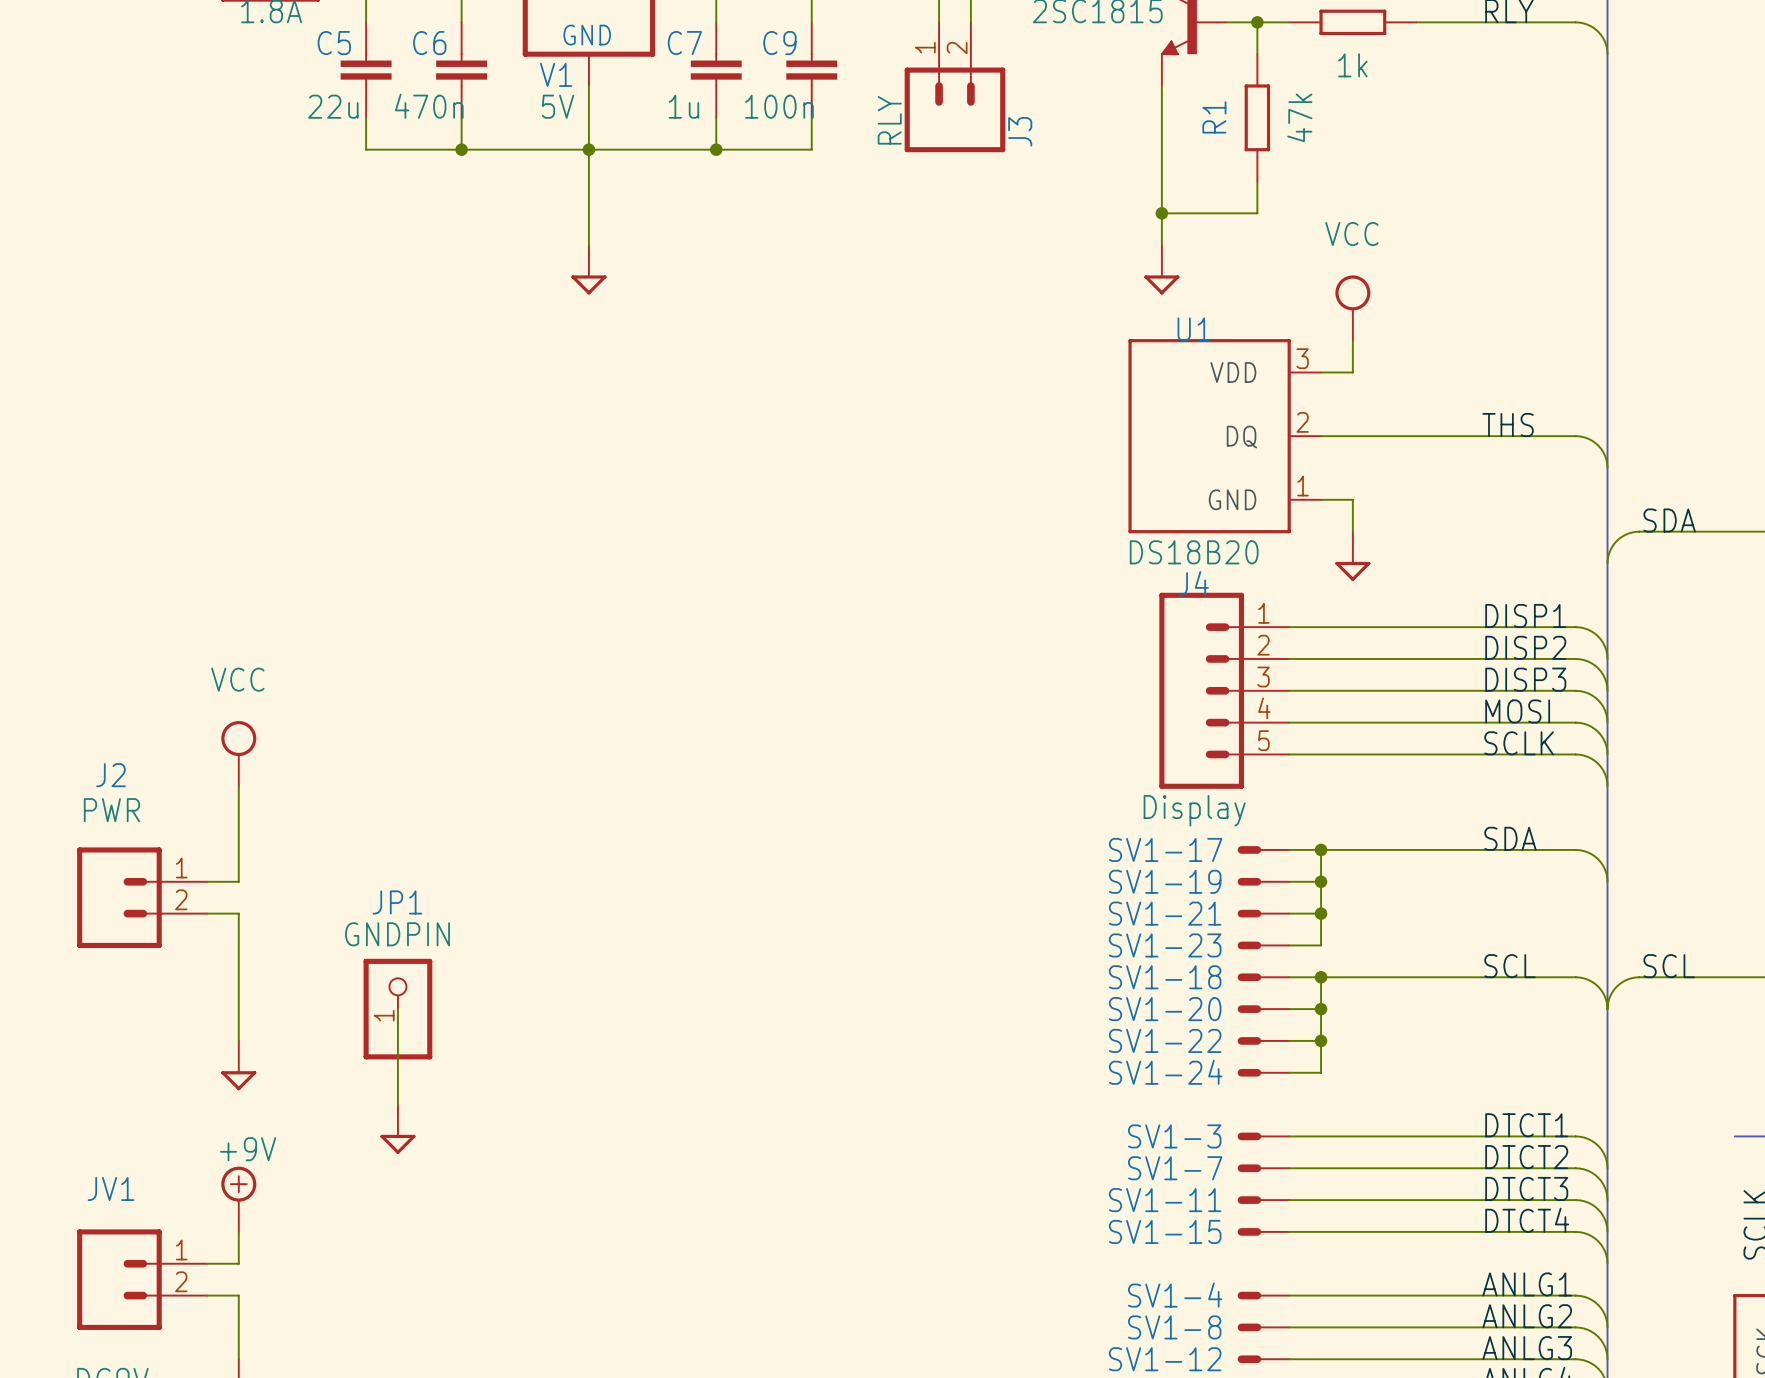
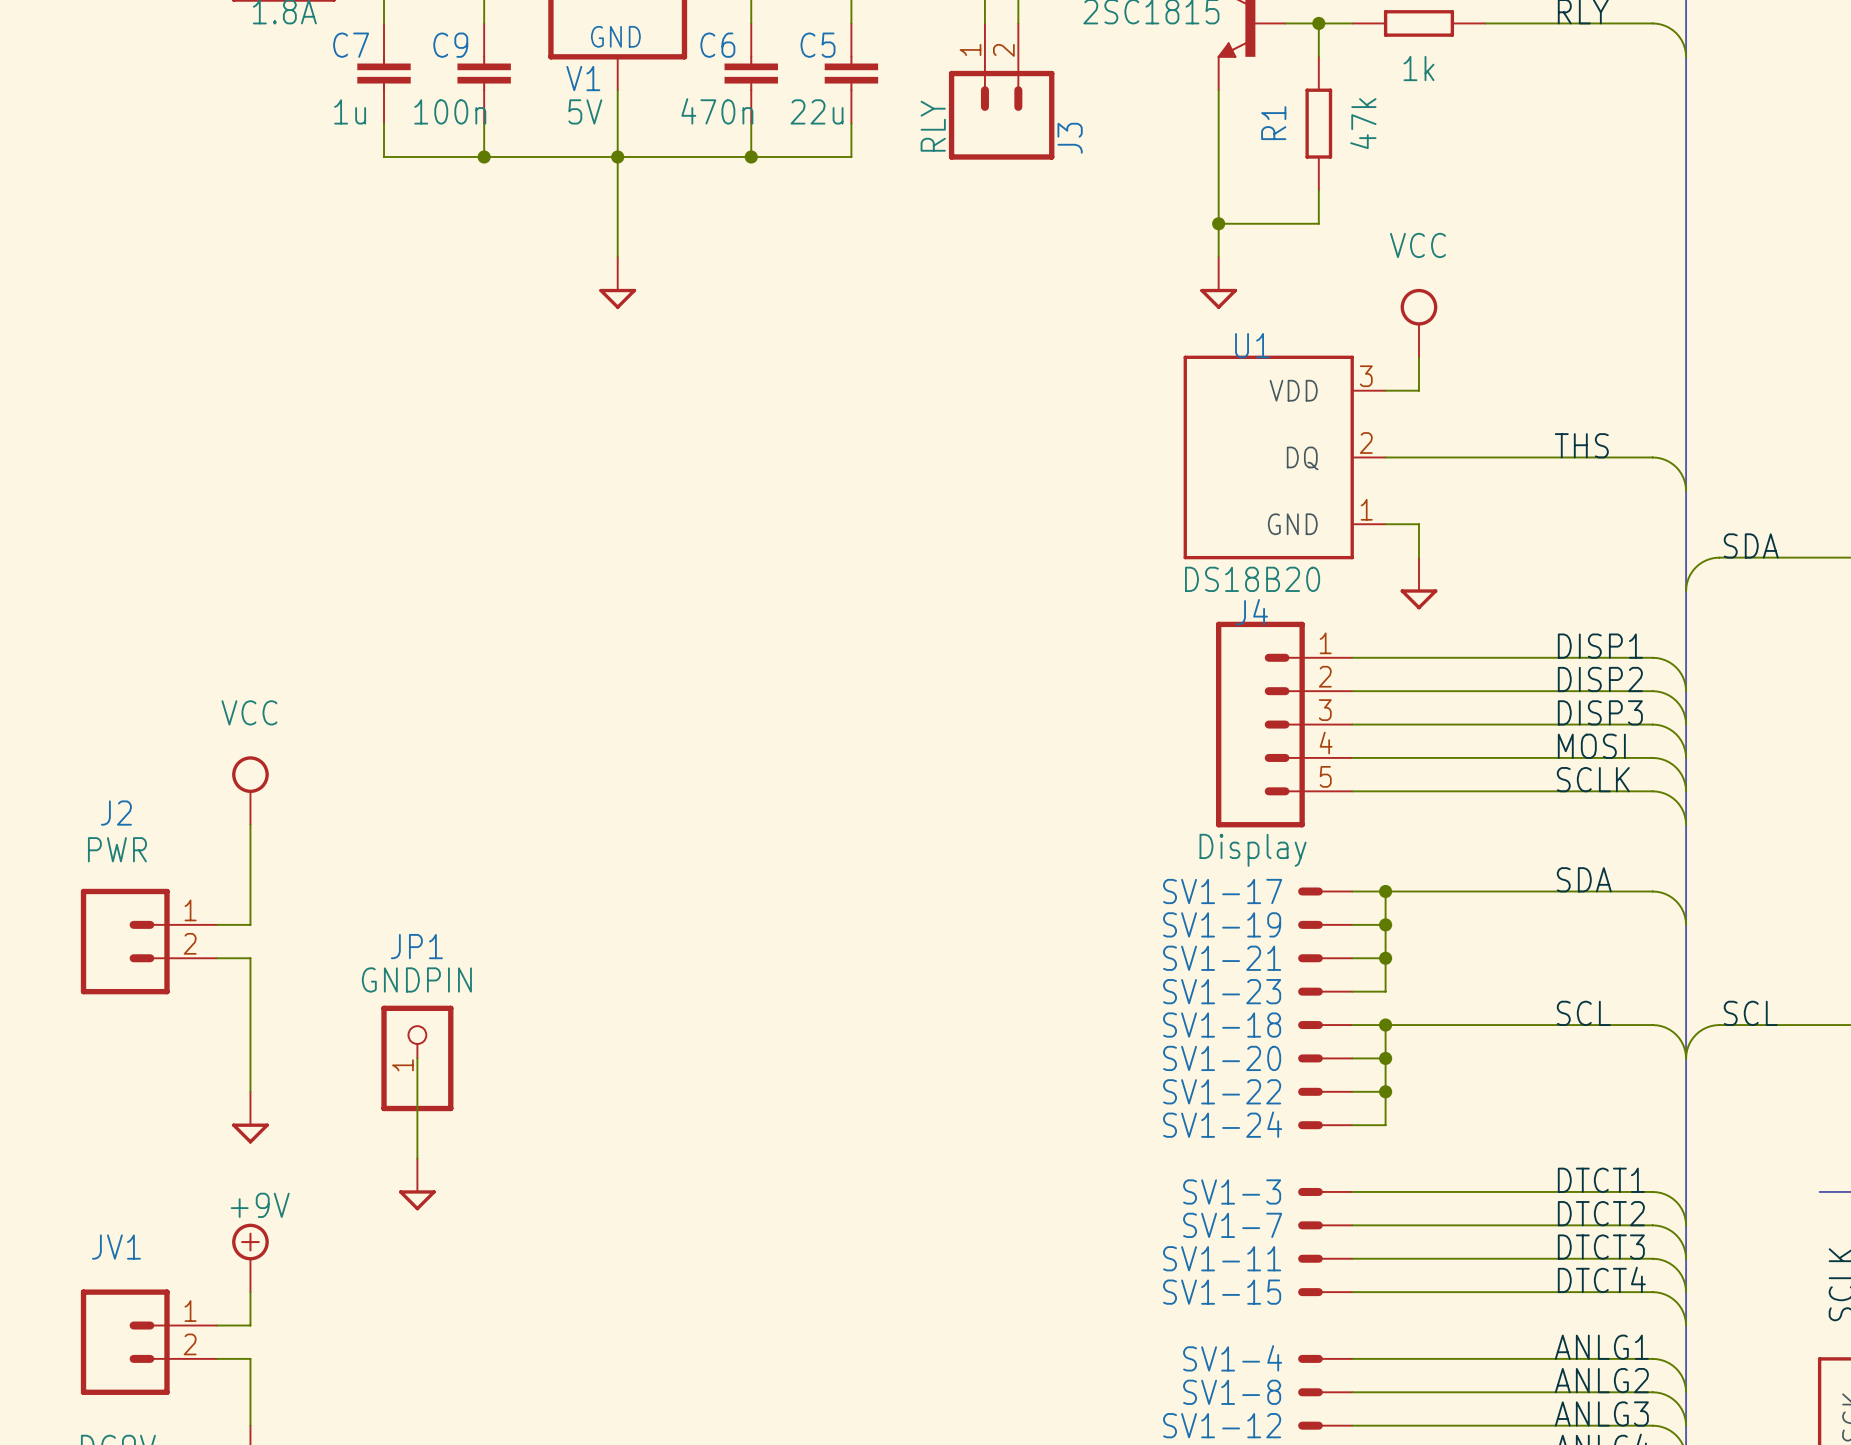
C5 name: C5 (334, 43) -> C7 (351, 45)
C6 name: C6 (429, 43) -> C9 (450, 45)
C7 name: C7 (684, 43) -> C6 (717, 45)
C9 name: C9 (779, 43) -> C5 (818, 45)
C5 value: 22u (333, 106) -> 1u (350, 111)
C6 value: 470n (429, 106) -> 100n (450, 111)
C7 value: 1u (683, 106) -> 470n (717, 111)
C9 value: 100n (779, 106) -> 22u (817, 111)

